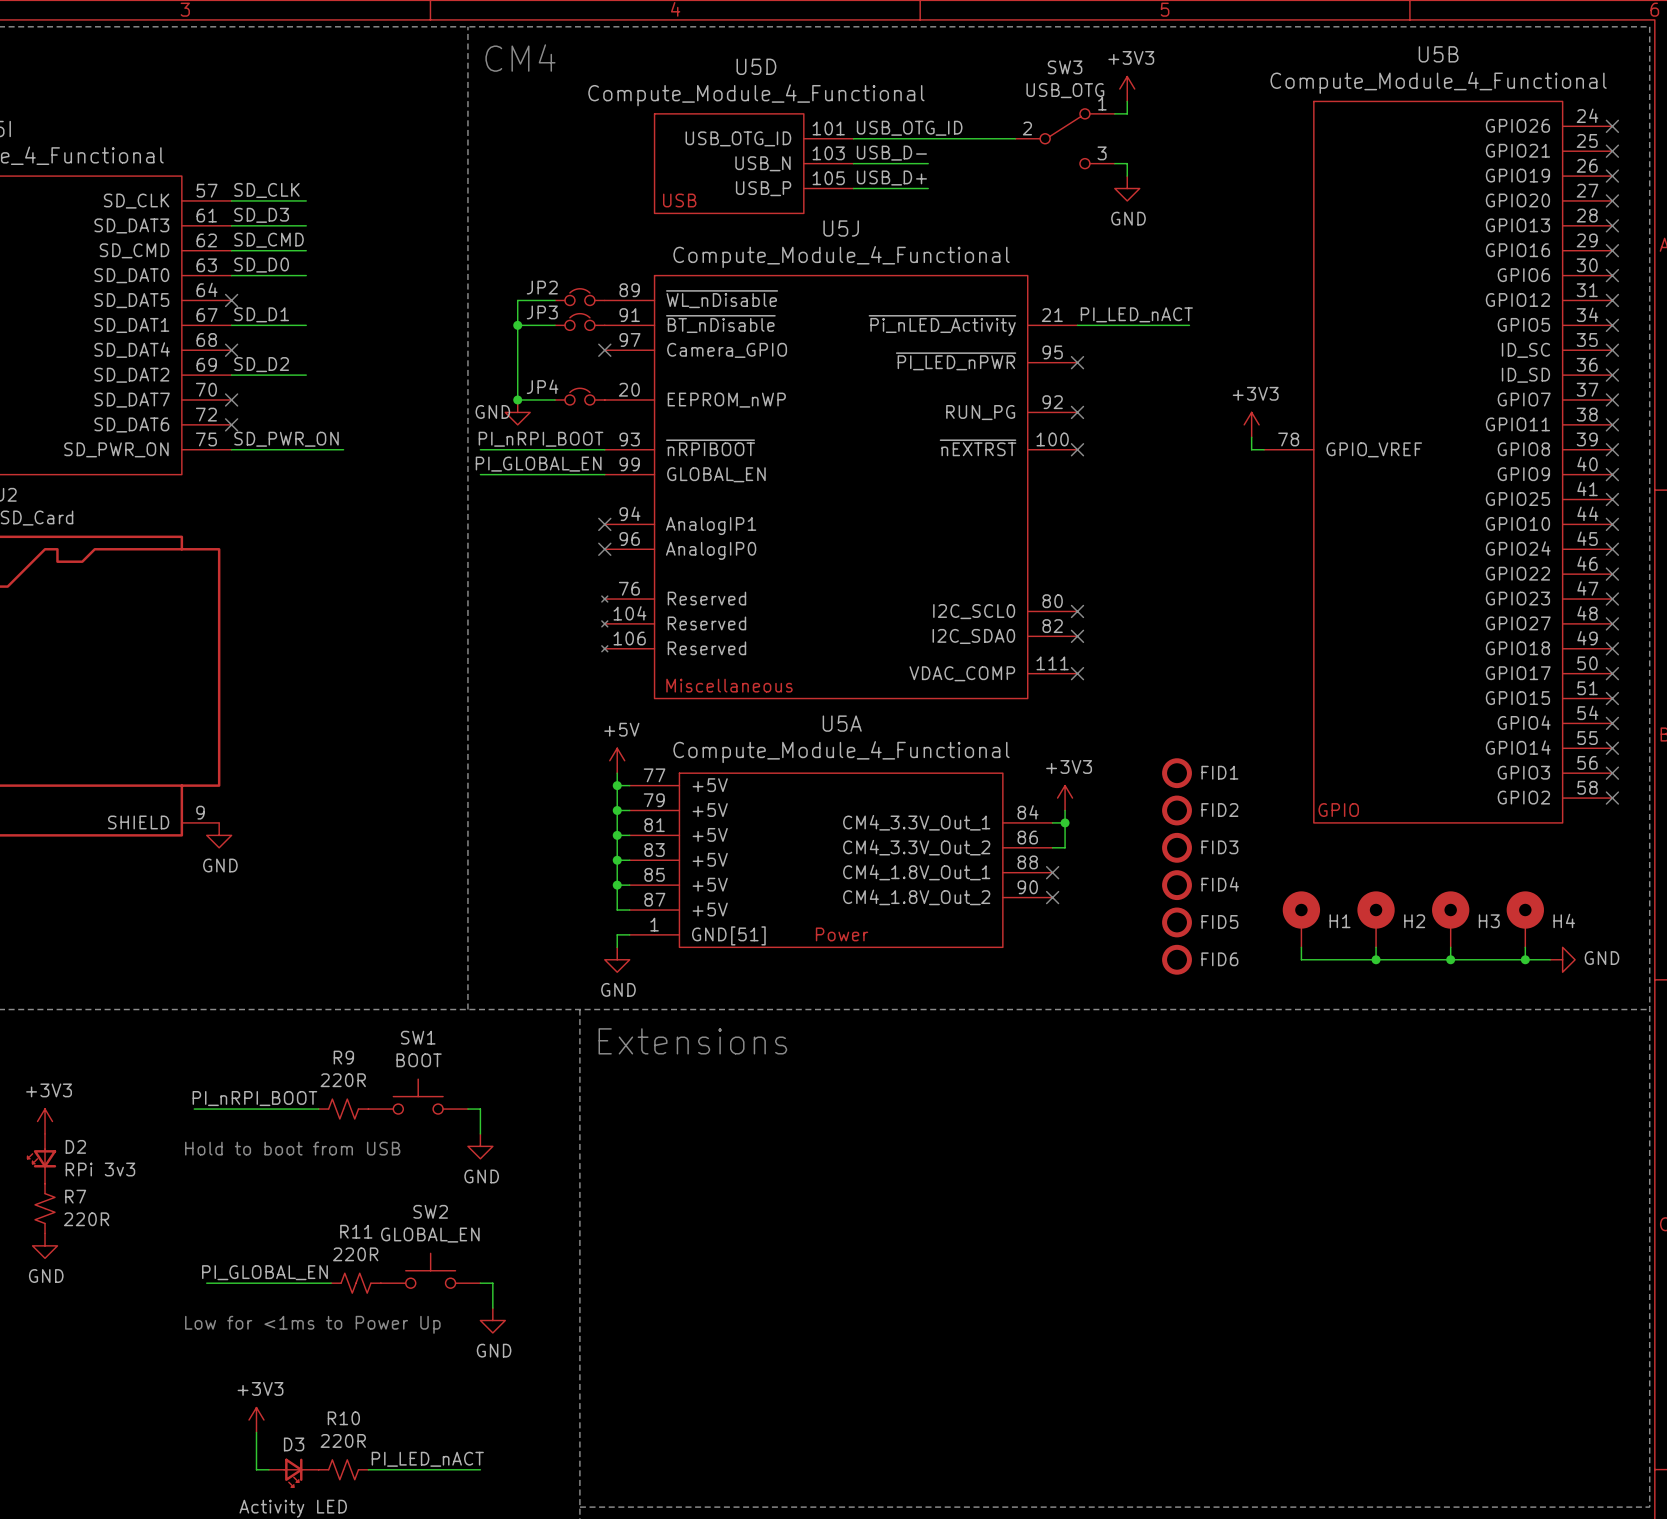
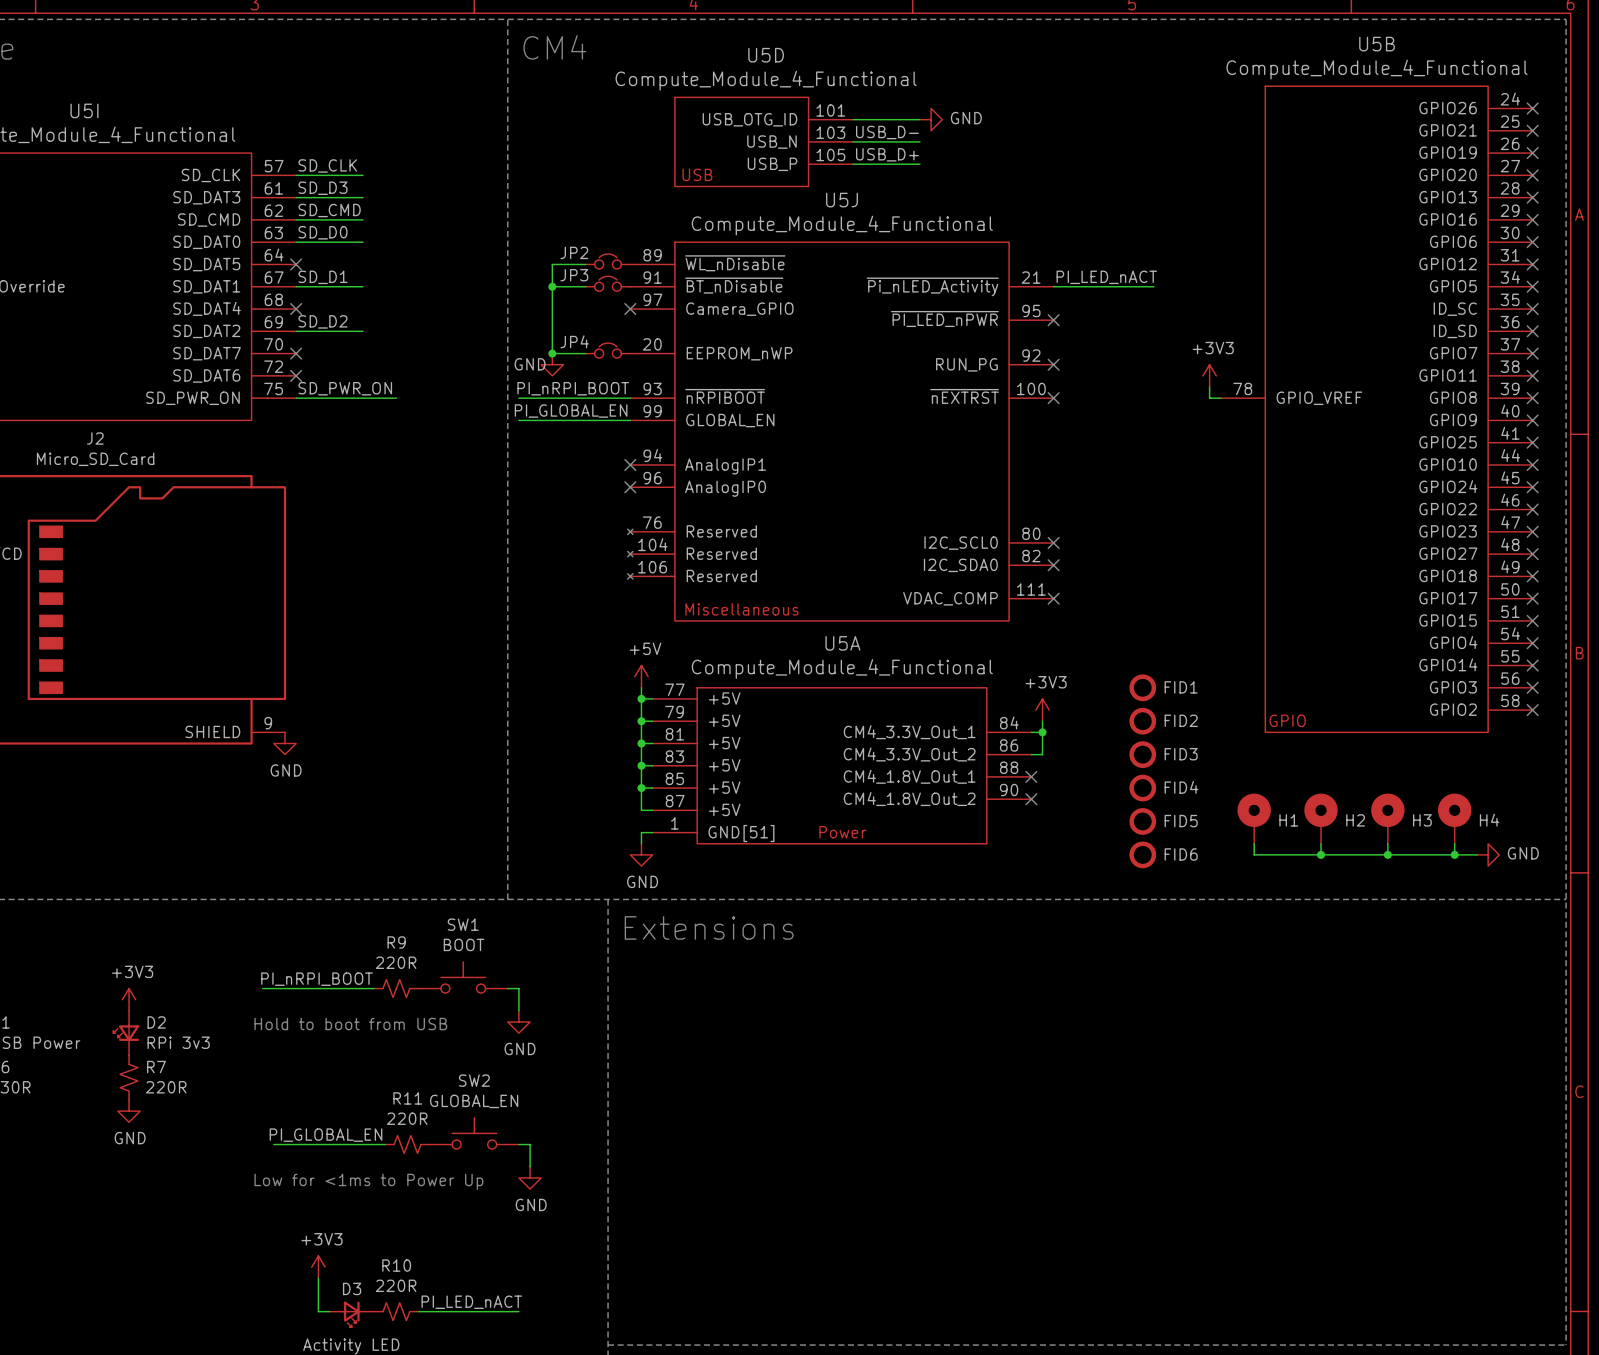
power symbol: +3V3 (1127, 89) -> none
wire: (1127, 101) (1127, 113) (1114, 113) -> none
label: USB_OTG_ID (909, 128) -> none
wire: (928, 138) (1015, 138) -> none
SW3: USB_OTG (1065, 138) -> none
wire: (1114, 163) (1127, 163) (1127, 176) -> none
power symbol rotation: 0° (1127, 188) -> 90° counterclockwise (931, 119)
power symbol position: GND (1127, 188) -> GND (931, 119)

